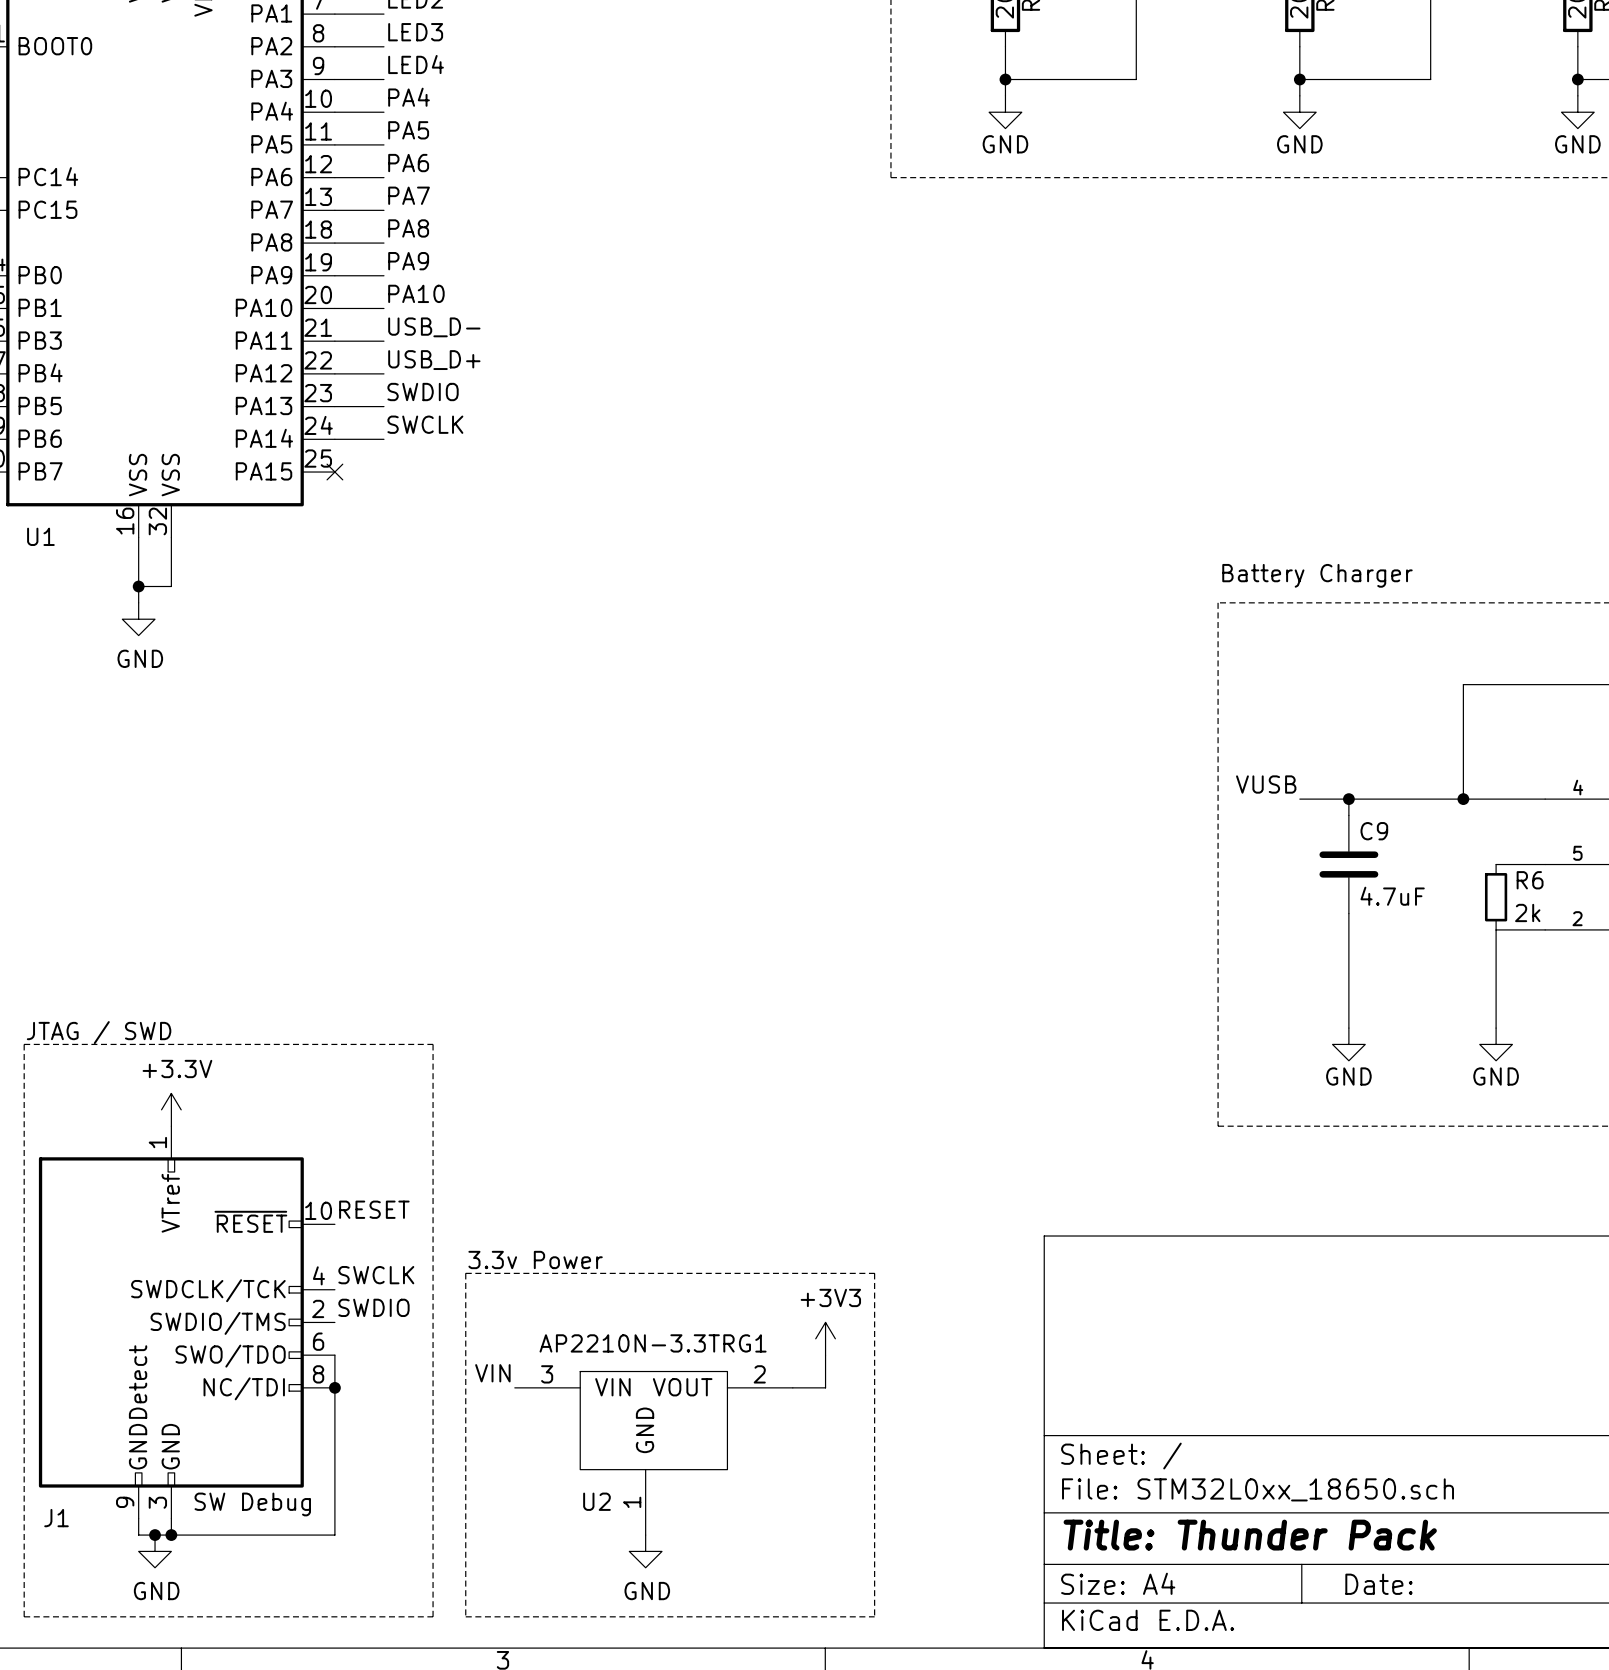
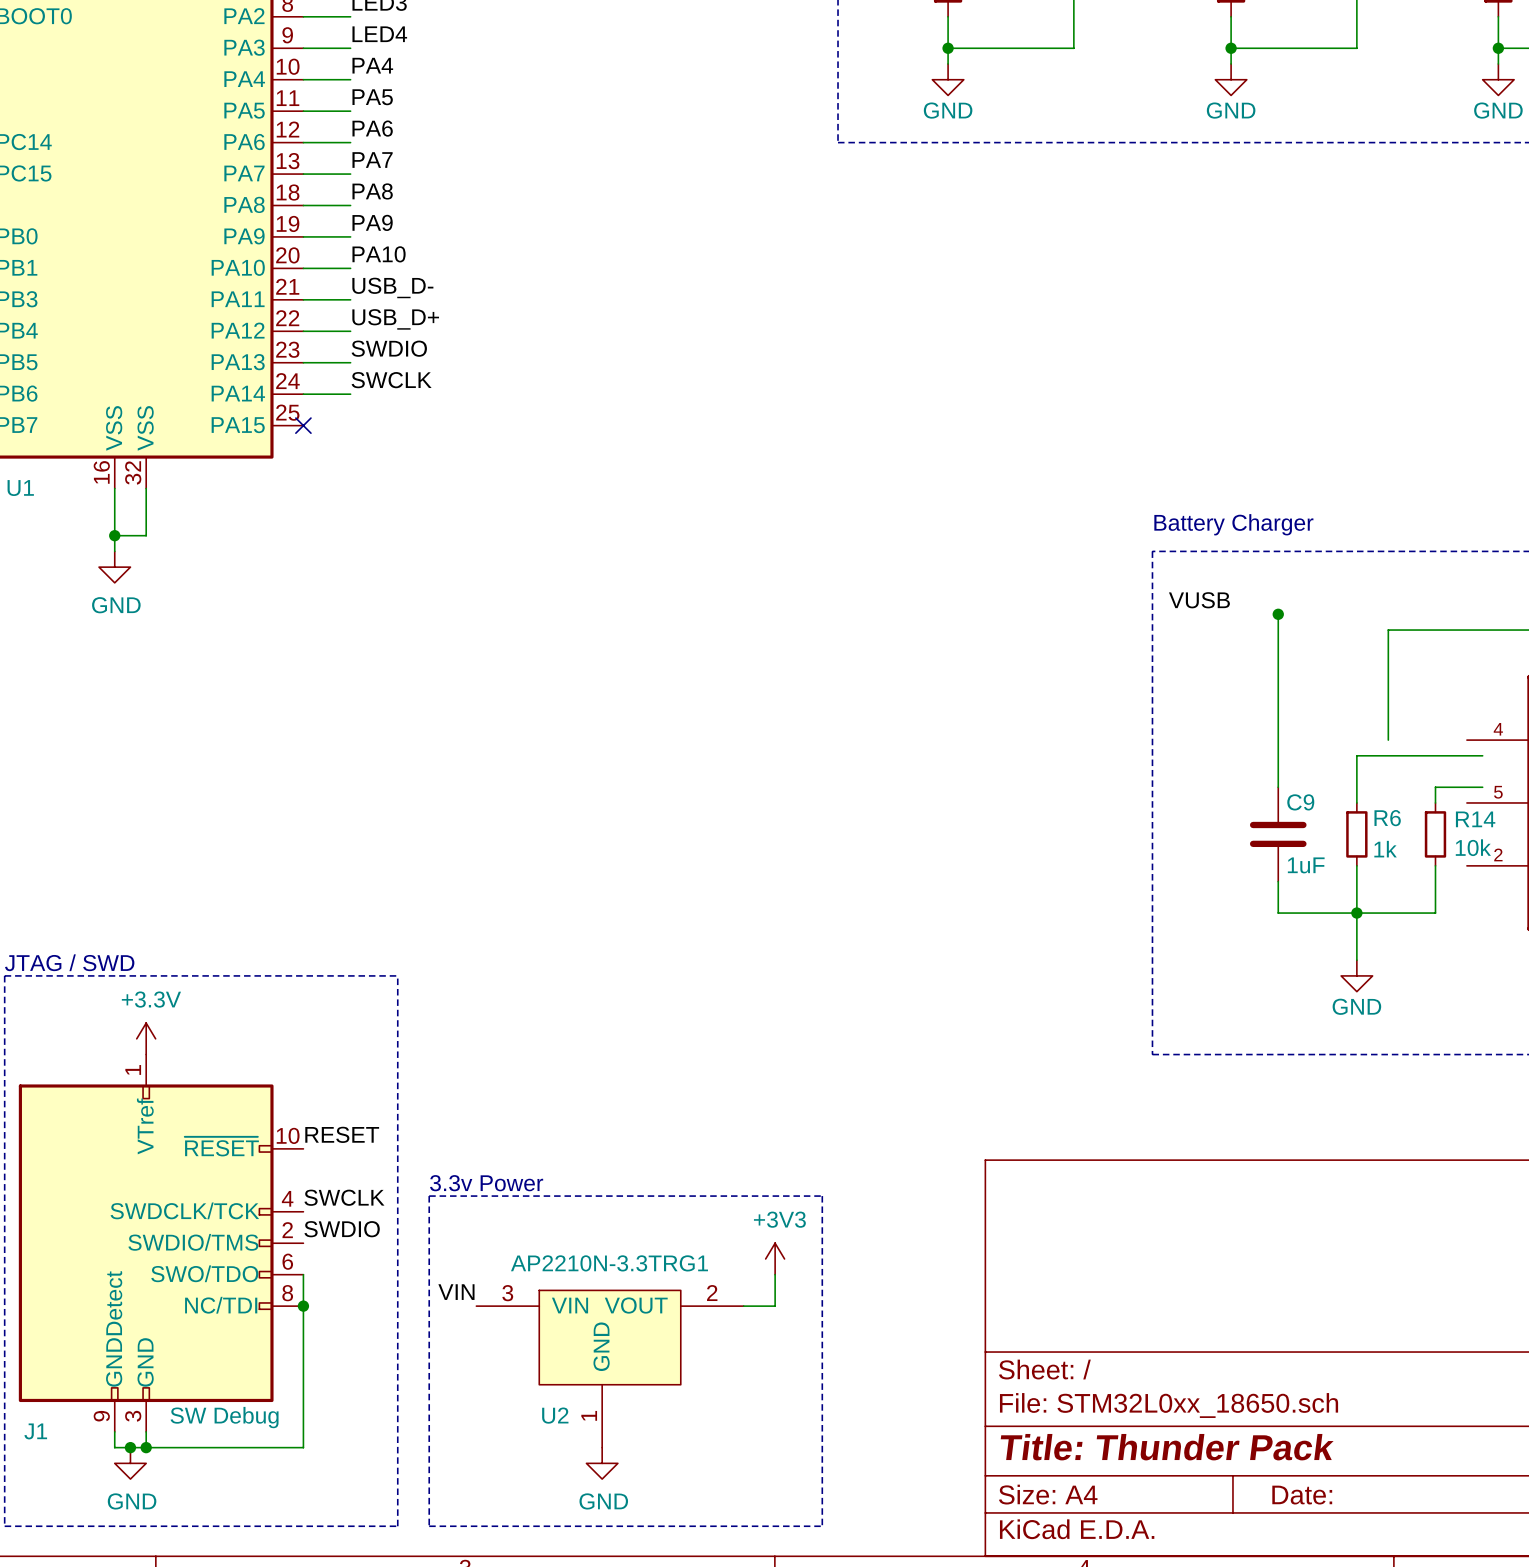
wire: none -> (1278, 614) (1278, 740)
junction: none -> (1278, 614)
label position: VUSB (1266, 784) -> VUSB (1199, 600)
wire: (1299, 799) (1545, 799) -> none
junction: (1348, 799) -> none
junction: (1463, 799) -> none
wire: none -> (1482, 755) (1356, 755) (1356, 802)
wire: none -> (1482, 787) (1435, 787) (1435, 802)
C9 position: (1348, 864) -> (1278, 834)
wire: (1496, 864) (1545, 864) -> none
C9 value: 4.7uF (1392, 896) -> 1uF (1306, 865)
R6 position: (1496, 897) -> (1356, 834)
R14: none -> 10k (1435, 834)
R6 value: 2k (1527, 912) -> 1k (1385, 849)
wire: none -> (1356, 865) (1356, 960)
wire: (1545, 929) (1496, 929) (1496, 1028) -> none
wire: (1348, 979) (1348, 1028) -> (1278, 913) (1435, 913) (1435, 865)
junction: none -> (1356, 913)
power symbol: GND (1348, 1044) -> none
power symbol: none -> GND (1356, 975)
power symbol: GND (1496, 1044) -> none

